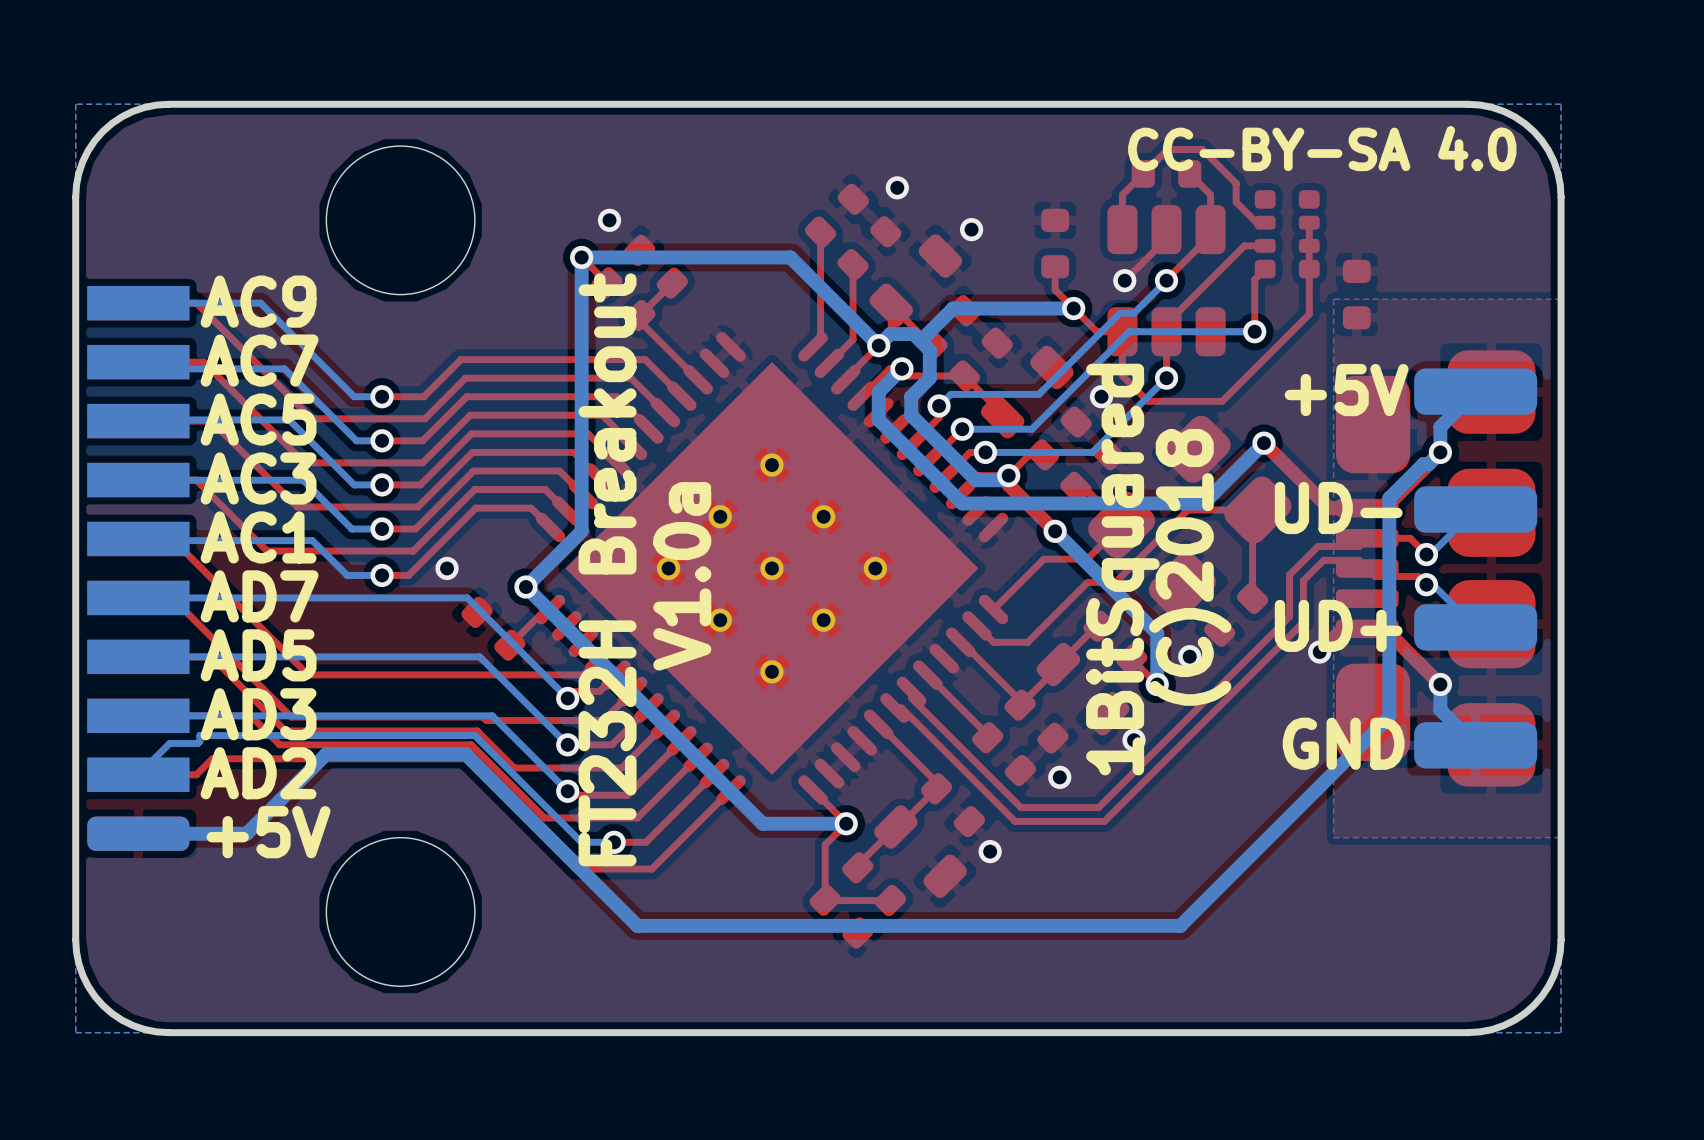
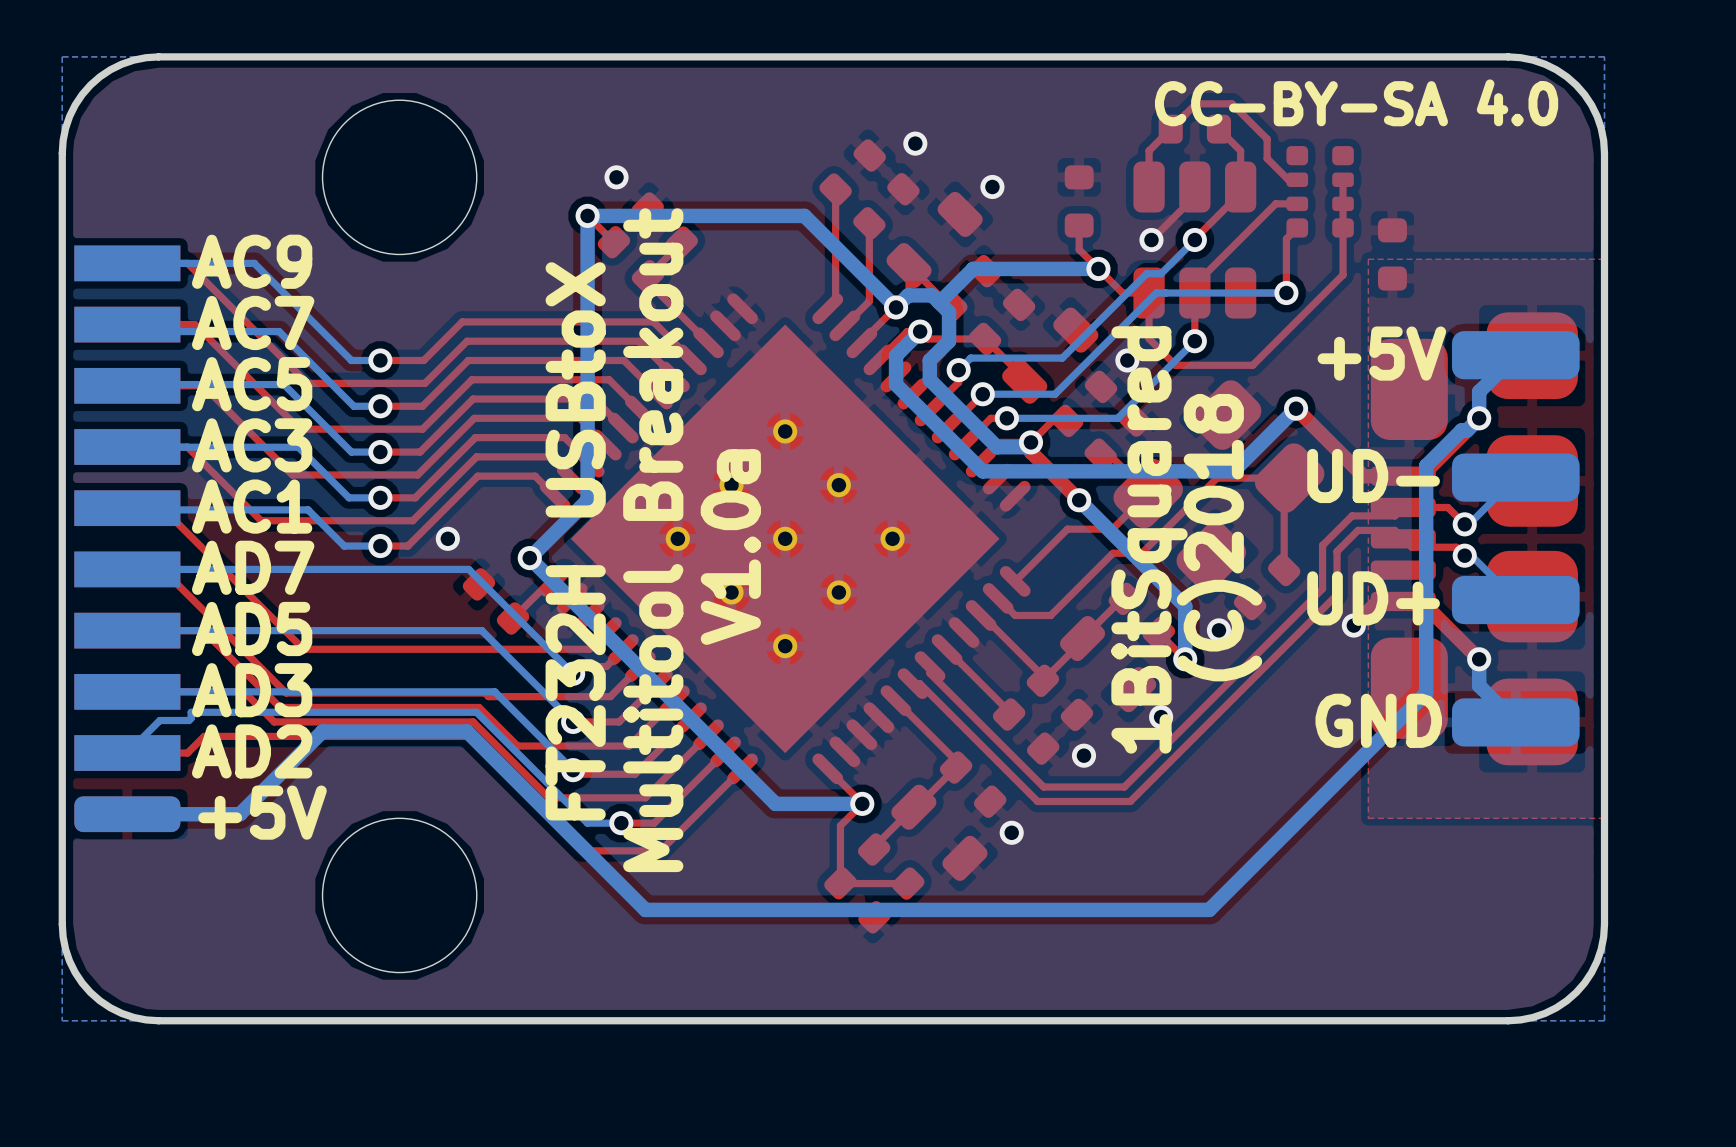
text: FT232H Breakout (607, 569) -> FT232H USBtoX (575, 541)
text: none -> Multitool Breakout (653, 540)
text position: V1.0a (682, 576) -> V1.0a (730, 547)

